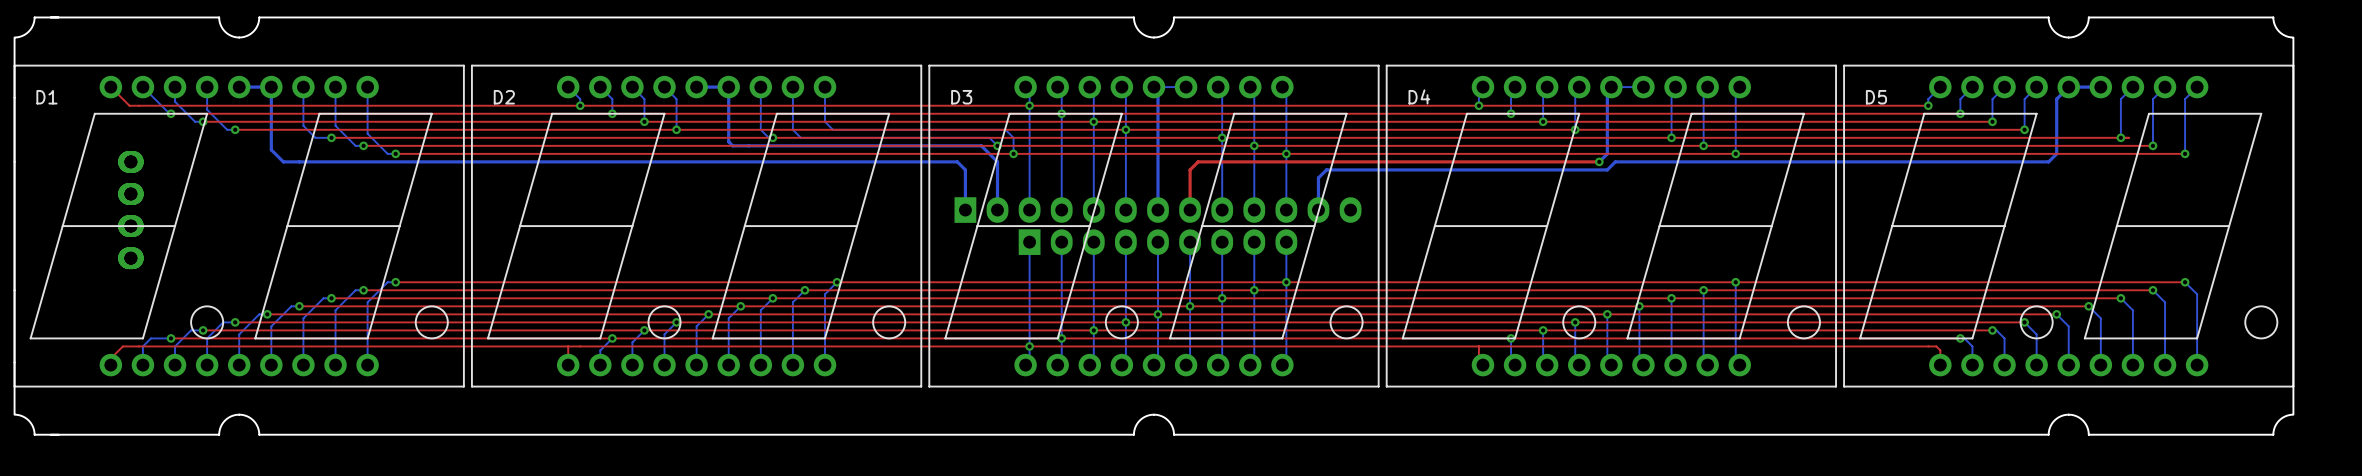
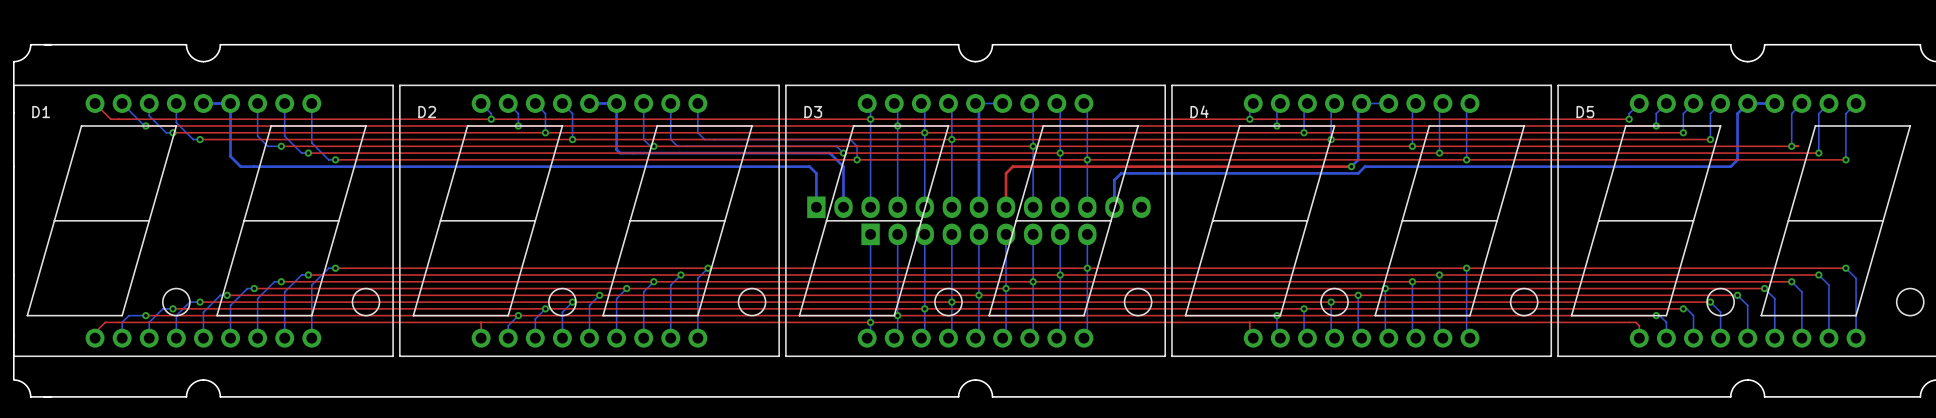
part: (130, 210) -> none

